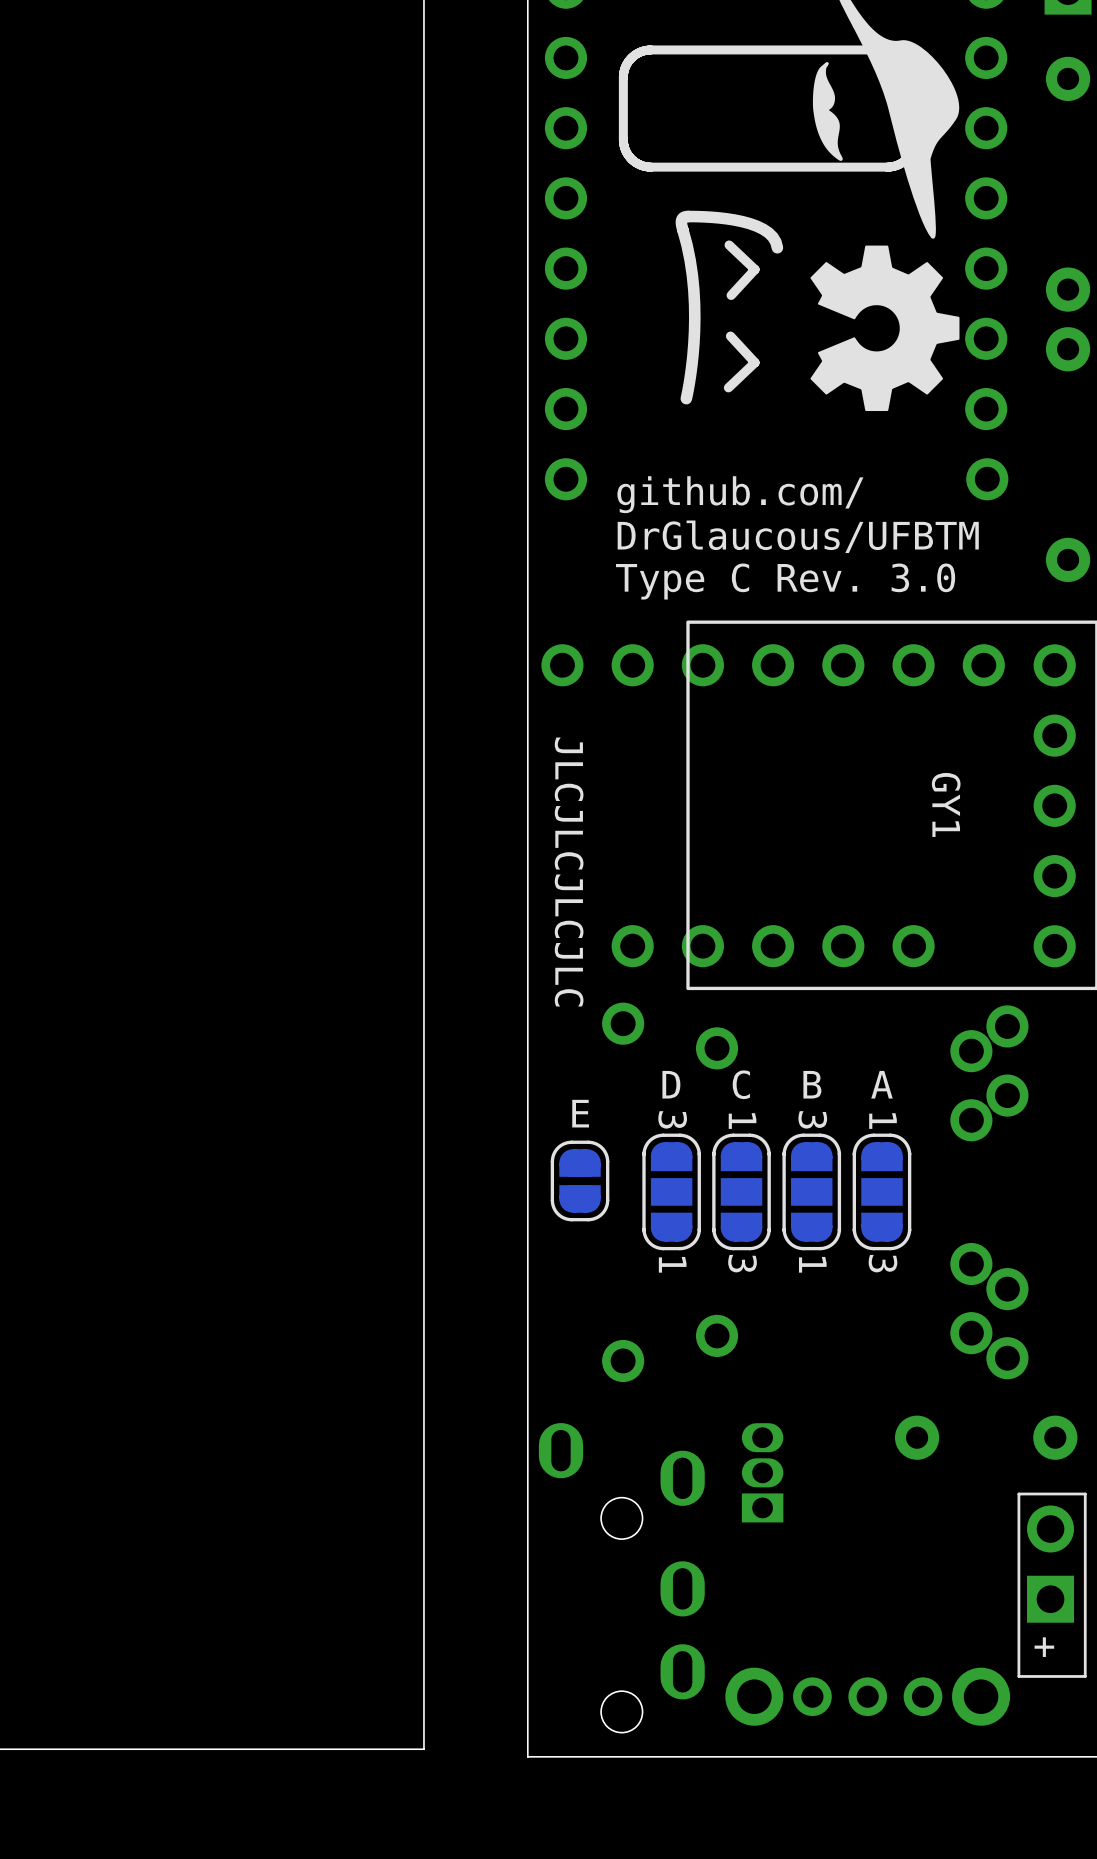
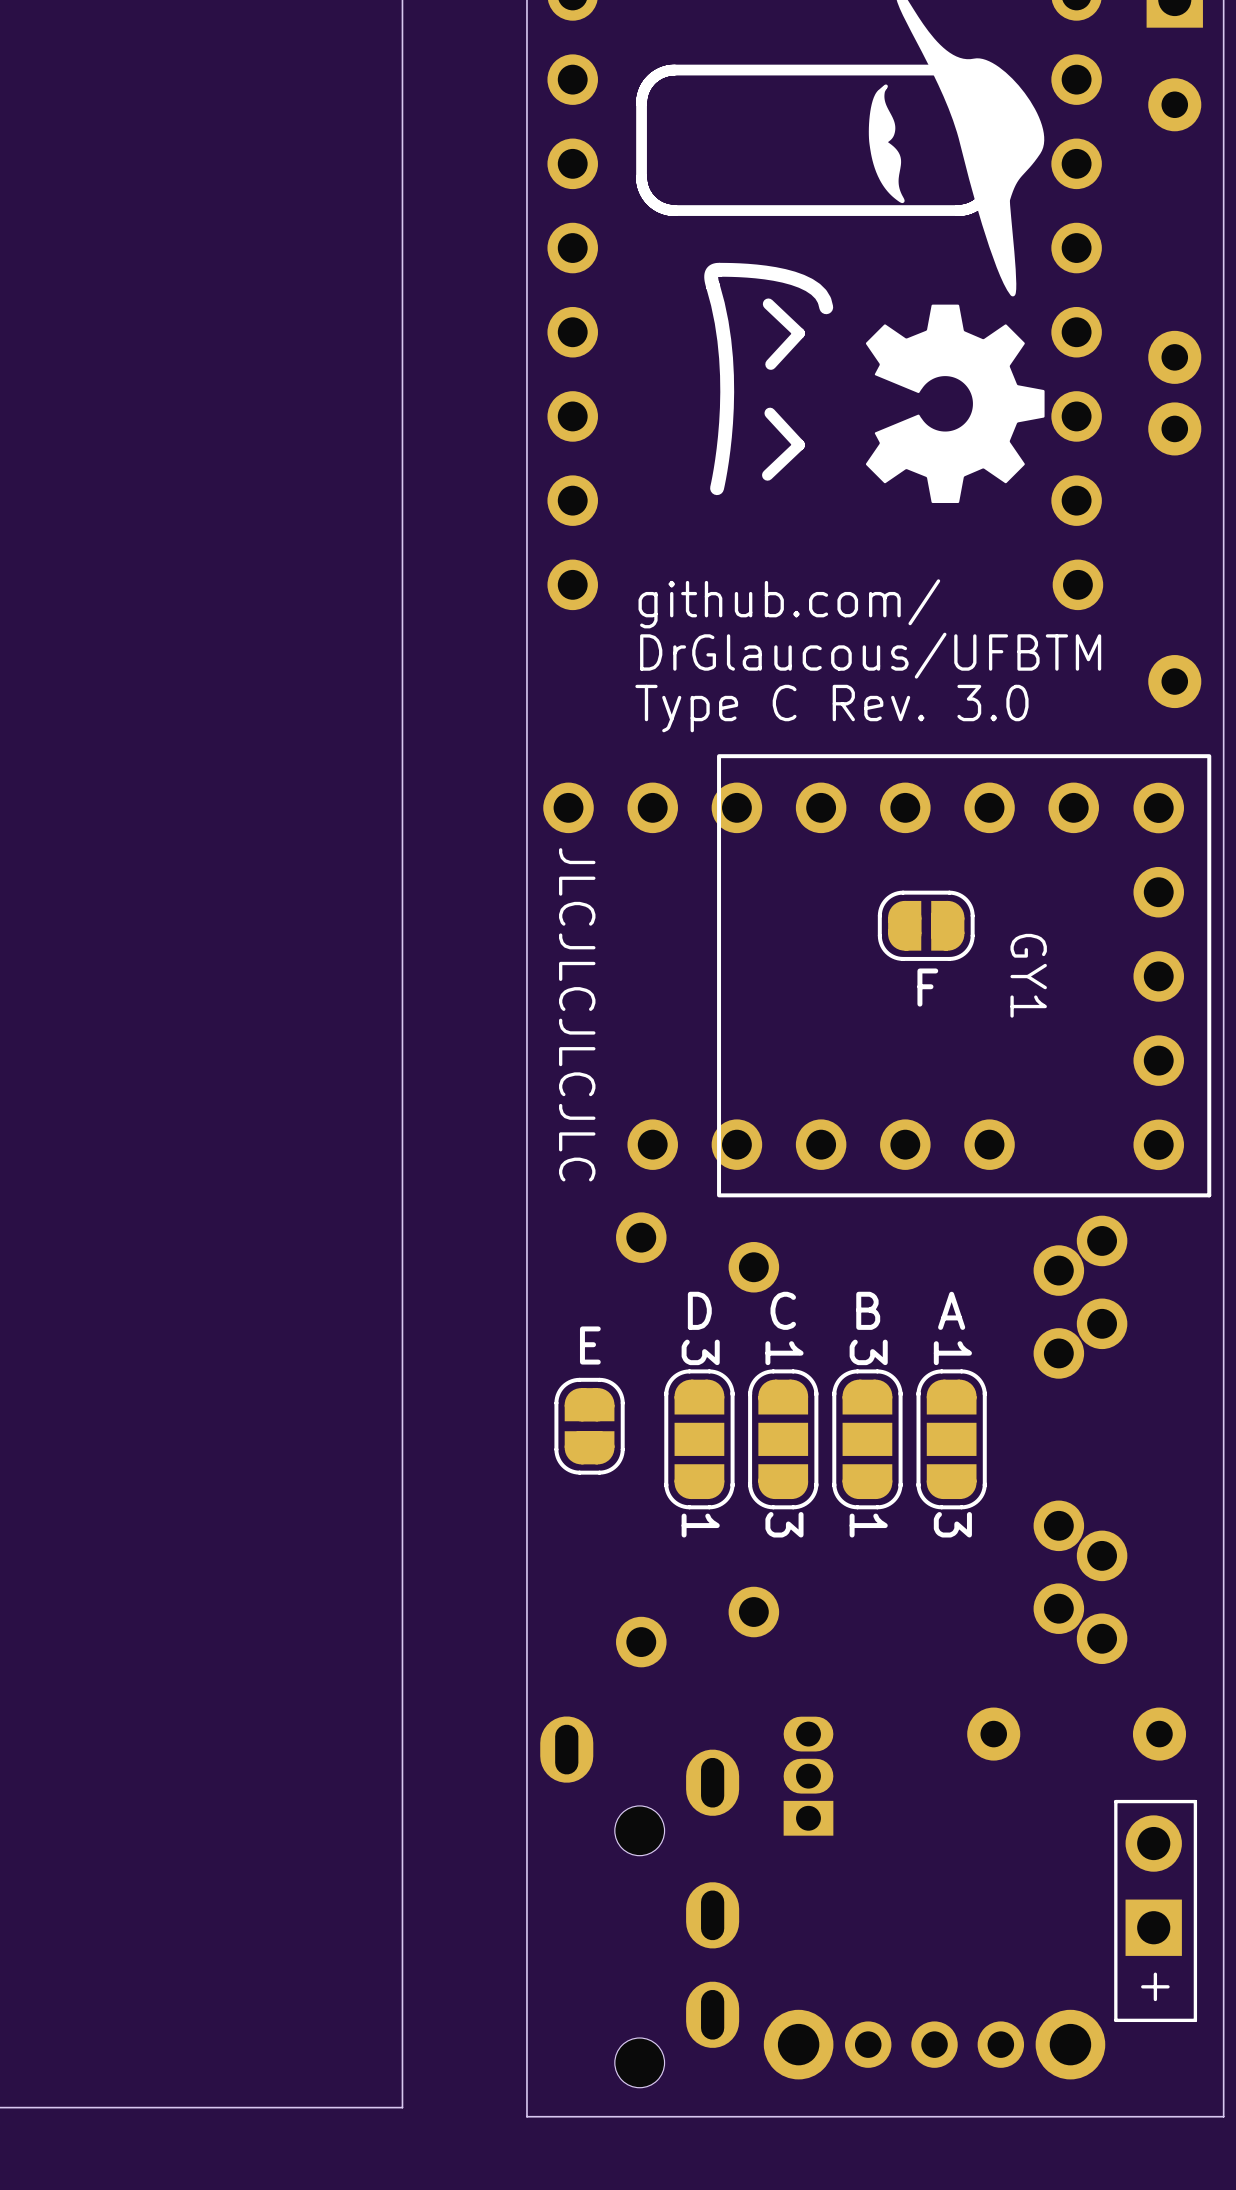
part: none -> F (926, 925)
text position: JLCJLCJLCJLC (569, 871) -> JLCJLCJLCJLC (577, 1014)

